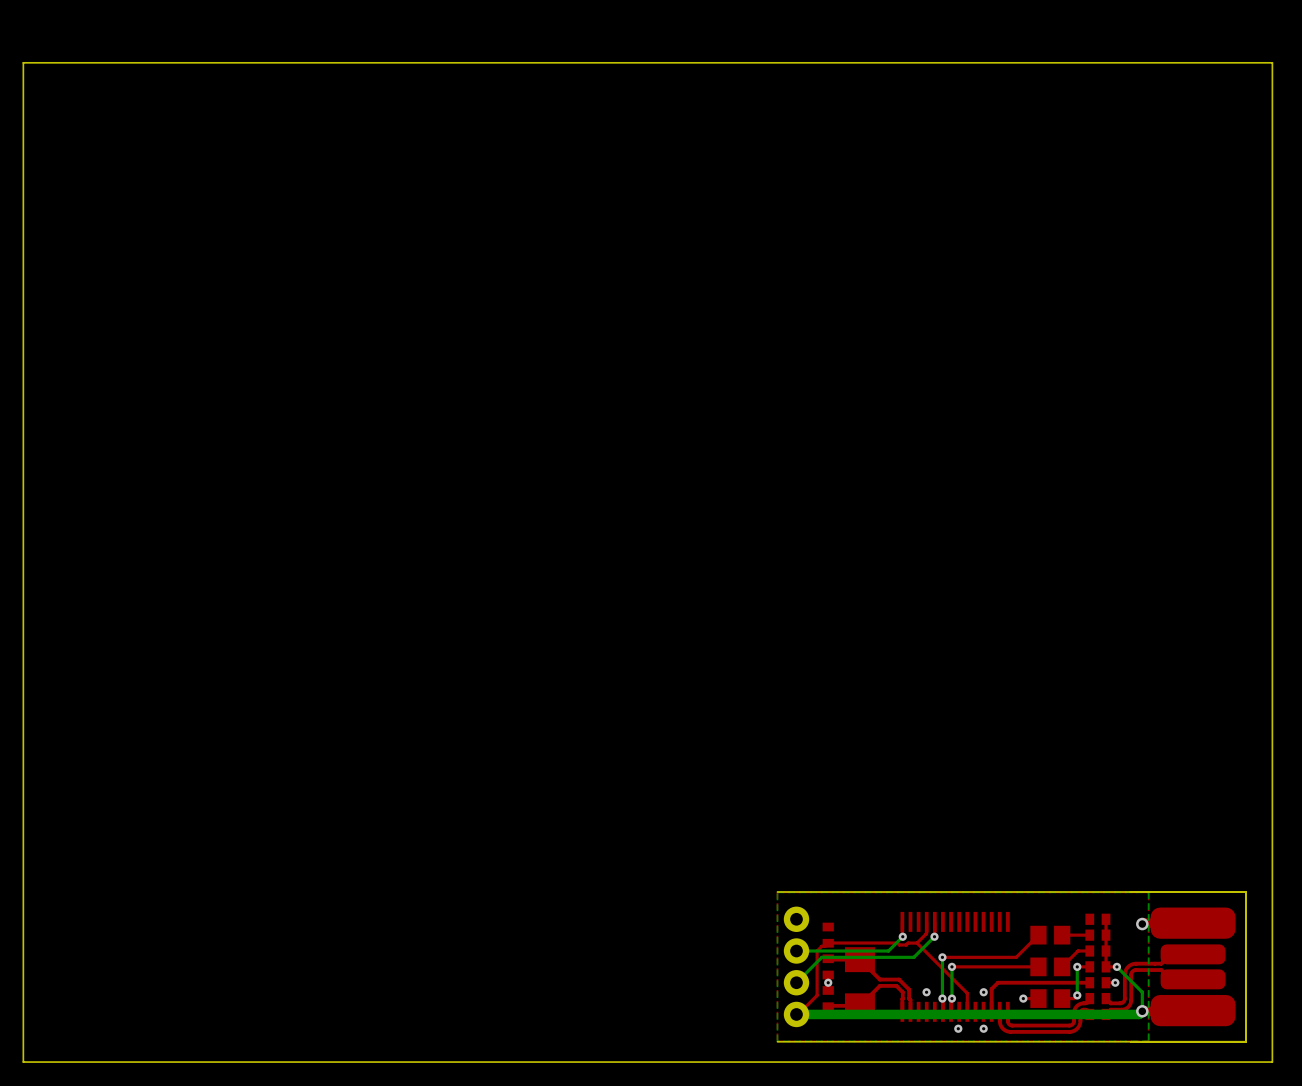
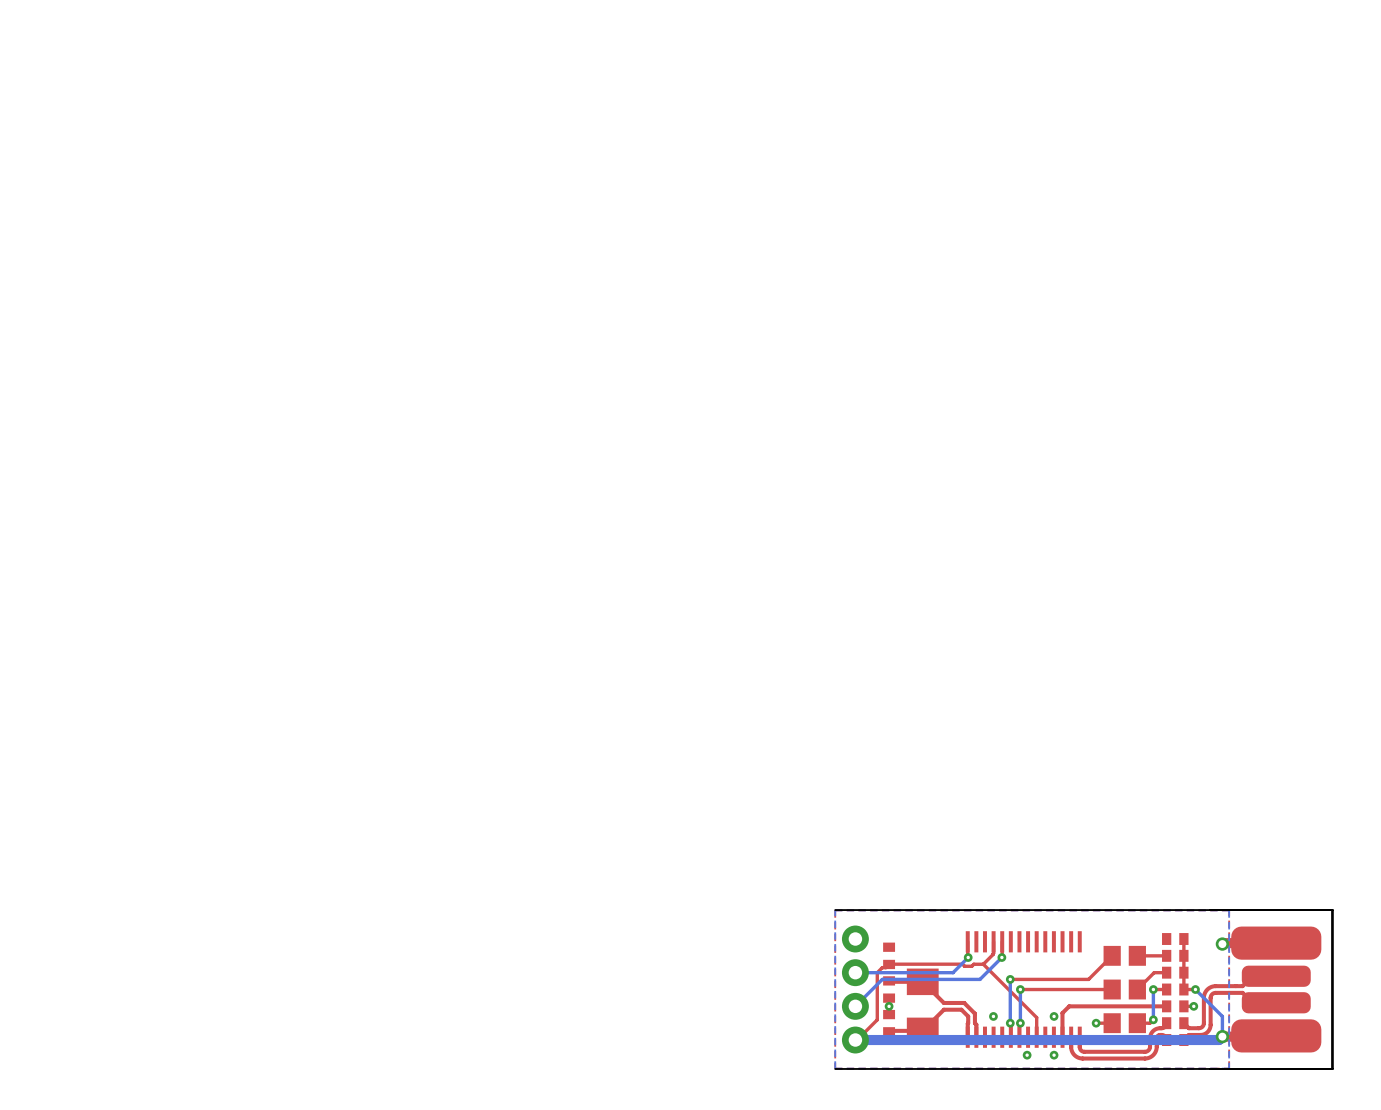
board edge: (1272, 62) (23, 62) (23, 1062) (1272, 1062) (1272, 62) -> none

